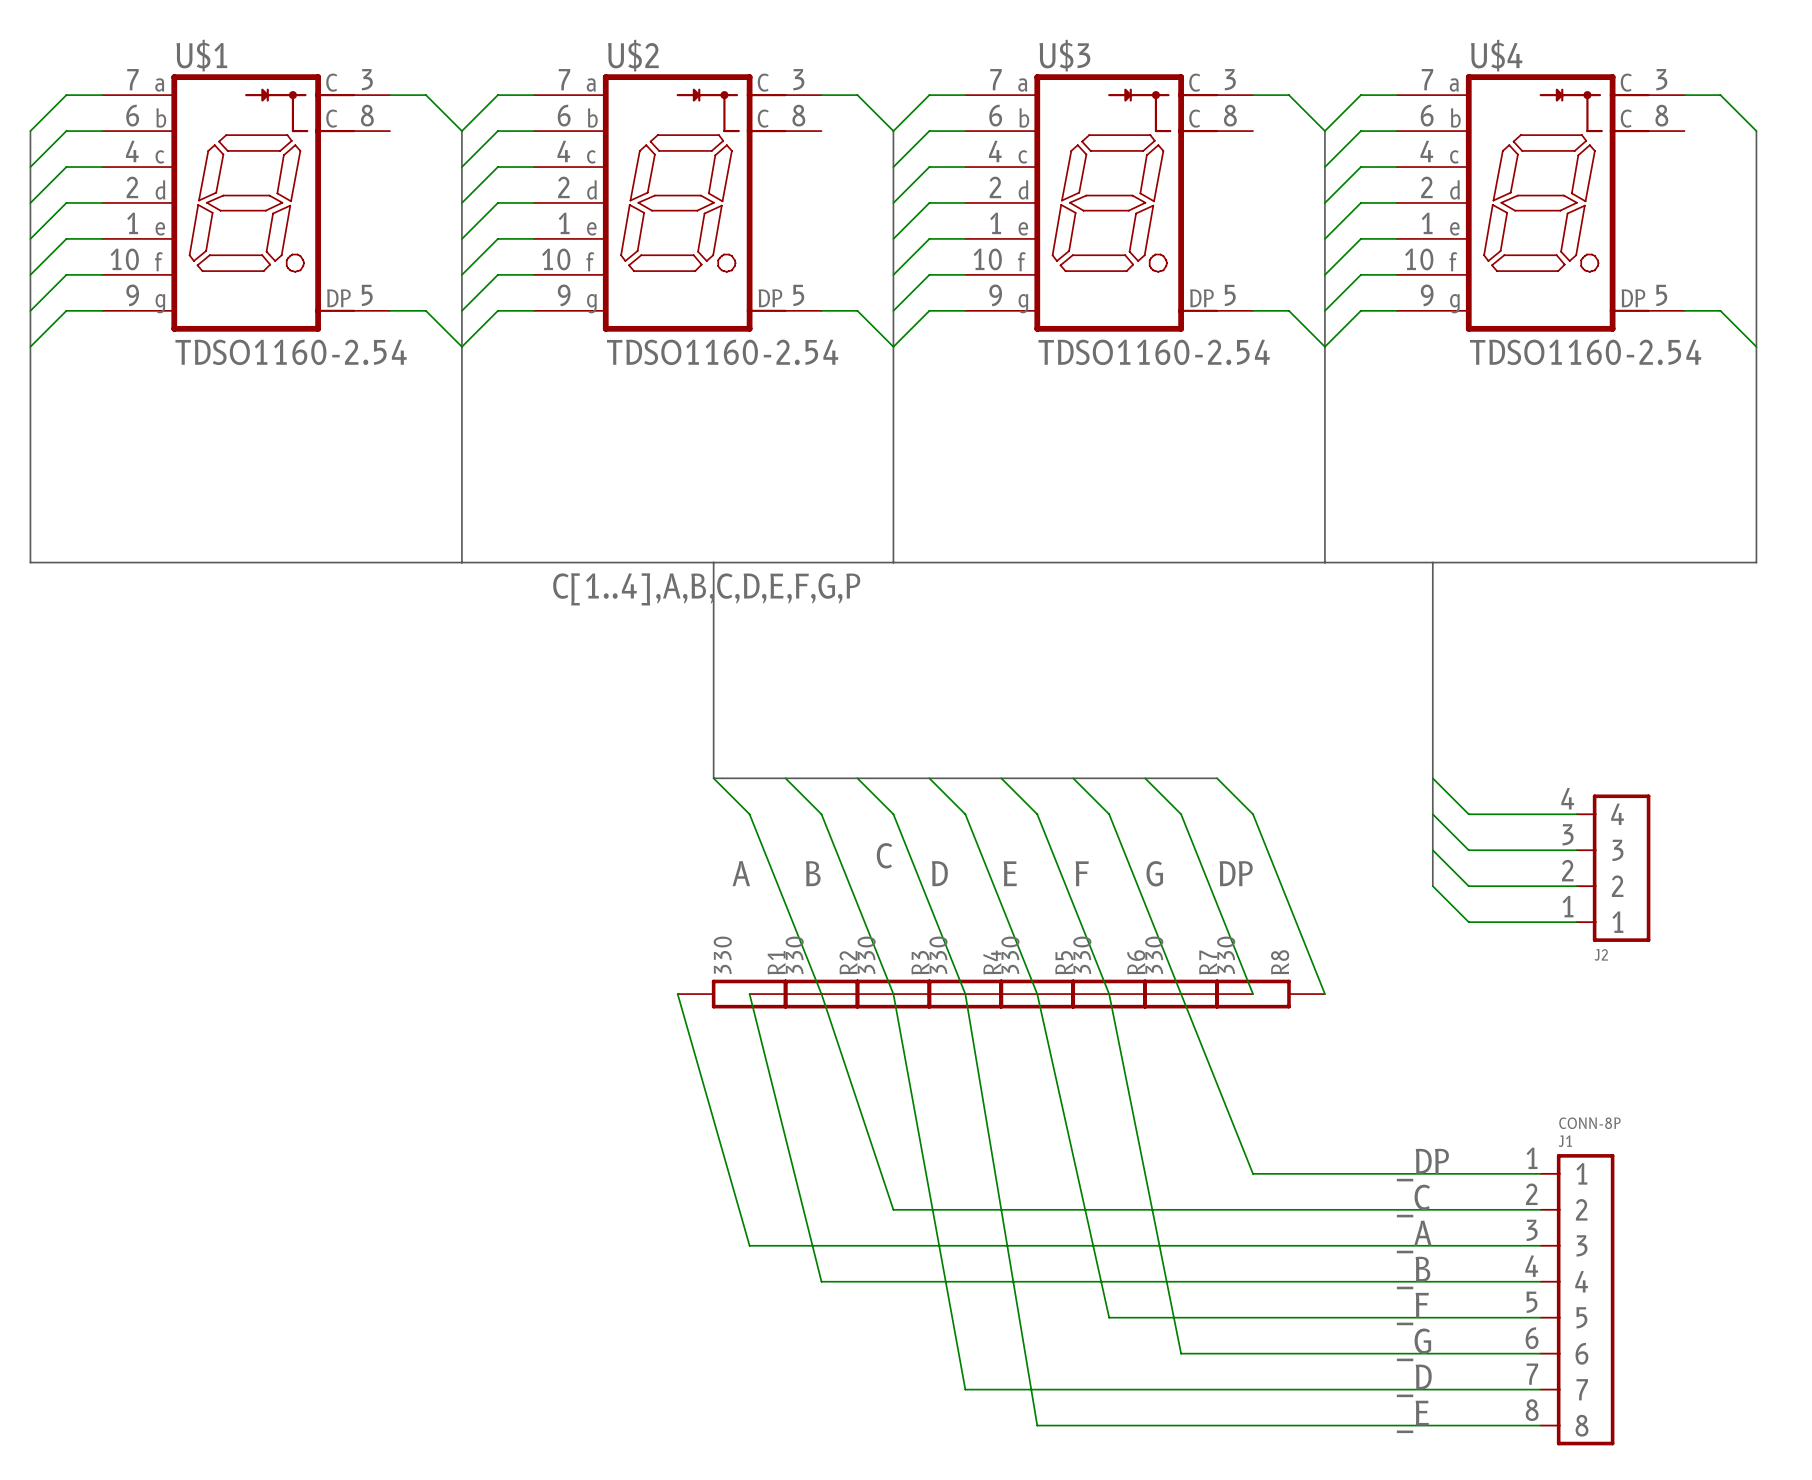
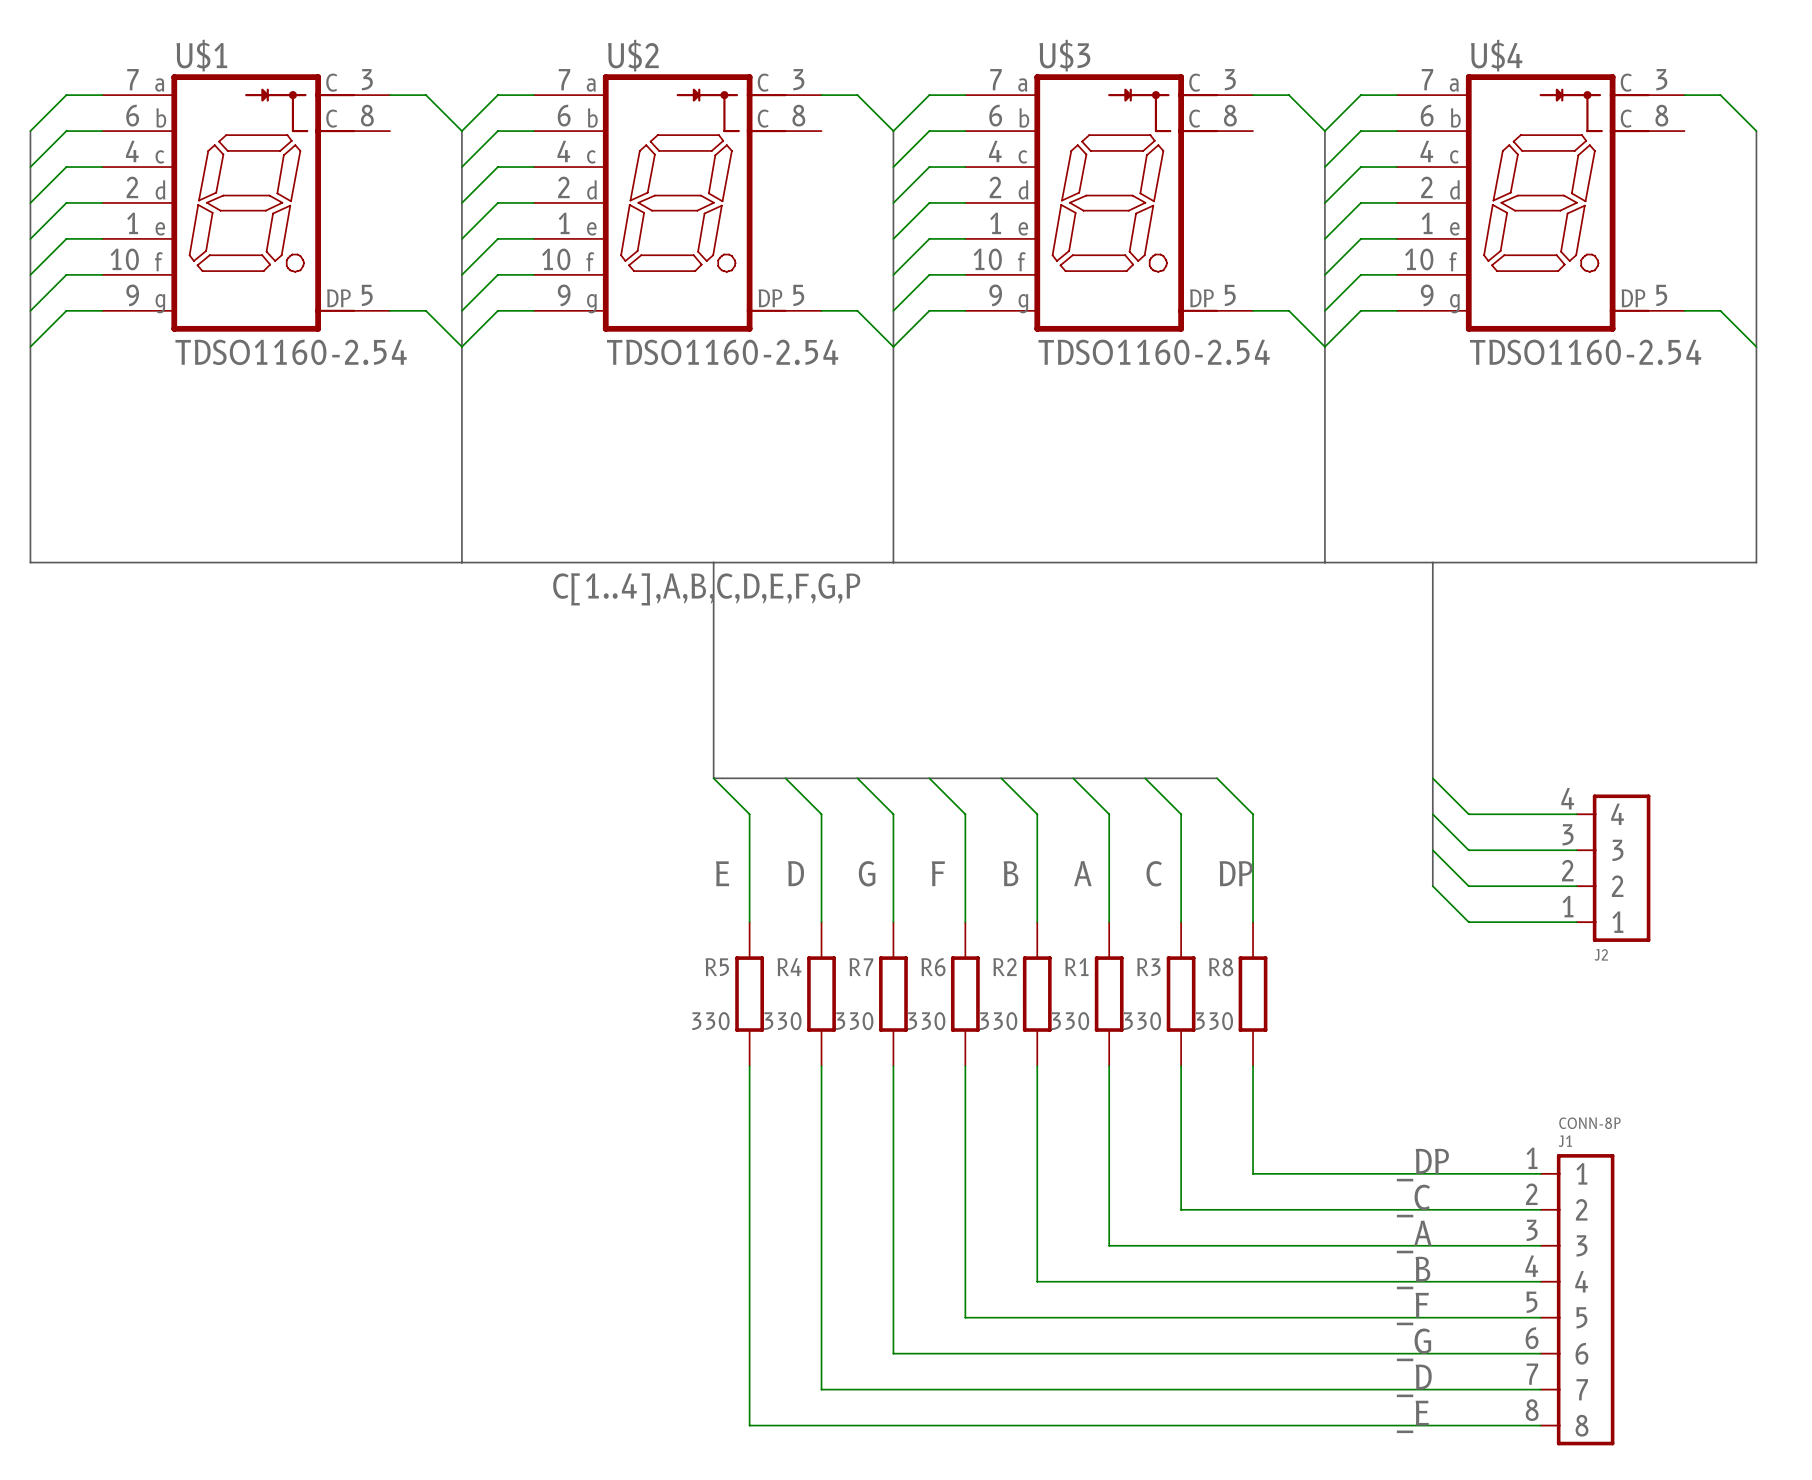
wire: (749, 814) (821, 994) (893, 1209) (1181, 1209) -> (1181, 1065) (1181, 1209)
wire: none -> (749, 814) (749, 922)
wire: (821, 814) (893, 994) (965, 1389) -> (821, 1065) (821, 1389) (965, 1389)
wire: none -> (821, 814) (821, 922)
wire: (893, 814) (965, 994) (1037, 1425) -> (749, 1065) (749, 1425) (1037, 1425)
wire: none -> (893, 814) (893, 922)
wire: (965, 814) (1037, 994) (1109, 1317) -> (965, 1065) (965, 1317) (1109, 1317)
wire: none -> (965, 814) (965, 922)
wire: (1037, 814) (1109, 994) (1181, 1353) -> (893, 1065) (893, 1353) (1181, 1353)
wire: none -> (1037, 814) (1037, 922)
wire: (1109, 814) (1253, 1173) -> (1109, 814) (1109, 922)
wire: (1181, 814) (1253, 994) -> (1181, 814) (1181, 922)
wire: (1253, 814) (1324, 994) -> (1253, 814) (1253, 922)
label: C (884, 855) -> none
label: none -> E (722, 873)
label: A (741, 873) -> none
label: none -> D (796, 873)
label: B (813, 873) -> none
label: none -> G (867, 873)
label: D (939, 873) -> F (938, 873)
label: E (1010, 873) -> B (1011, 873)
label: F (1082, 873) -> A (1082, 873)
label: G (1154, 873) -> C (1154, 873)
R1 value position: 330 (722, 955) -> 330 (1070, 1021)
R2 value position: 330 (794, 955) -> 330 (998, 1021)
R3 value position: 330 (866, 955) -> 330 (1142, 1021)
R4 value position: 330 (938, 955) -> 330 (782, 1021)
R5 value position: 330 (1010, 955) -> 330 (710, 1021)
R6 value position: 330 (1082, 955) -> 330 (926, 1021)
R7 value position: 330 (1154, 955) -> 330 (854, 1021)
R8 value position: 330 (1226, 955) -> 330 (1214, 1021)
R1 name position: R1 (776, 962) -> R1 (1076, 967)
R2 name position: R2 (848, 962) -> R2 (1004, 967)
R3 name position: R3 (920, 962) -> R3 (1148, 967)
R4 name position: R4 (992, 962) -> R4 (789, 967)
R5 name position: R5 (1064, 962) -> R5 (717, 967)
R6 name position: R6 (1136, 962) -> R6 (933, 967)
R7 name position: R7 (1208, 962) -> R7 (861, 967)
R8 name position: R8 (1280, 962) -> R8 (1221, 967)
wire: (677, 994) (749, 1245) (1109, 1245) -> (1109, 1065) (1109, 1245)
wire: (749, 994) (821, 1281) (1037, 1281) -> (1037, 1065) (1037, 1281)
R1 rotation: 0° (749, 994) -> 90° clockwise (1109, 994)
R1 position: (749, 994) -> (1109, 994)
R2 rotation: 0° (821, 994) -> 90° clockwise (1037, 994)
R2 position: (821, 994) -> (1037, 994)
R3 rotation: 0° (893, 994) -> 90° clockwise (1181, 994)
R3 position: (893, 994) -> (1181, 994)
R4 rotation: 0° (965, 994) -> 90° clockwise (821, 994)
R4 position: (965, 994) -> (821, 994)
R5 rotation: 0° (1037, 994) -> 90° clockwise (749, 994)
R5 position: (1037, 994) -> (749, 994)
R6 rotation: 0° (1109, 994) -> 90° clockwise (965, 994)
R6 position: (1109, 994) -> (965, 994)
R7 rotation: 0° (1181, 994) -> 90° clockwise (893, 994)
R7 position: (1181, 994) -> (893, 994)
R8 rotation: 0° (1253, 994) -> 90° clockwise (1253, 994)
wire: none -> (1253, 1065) (1253, 1173)

